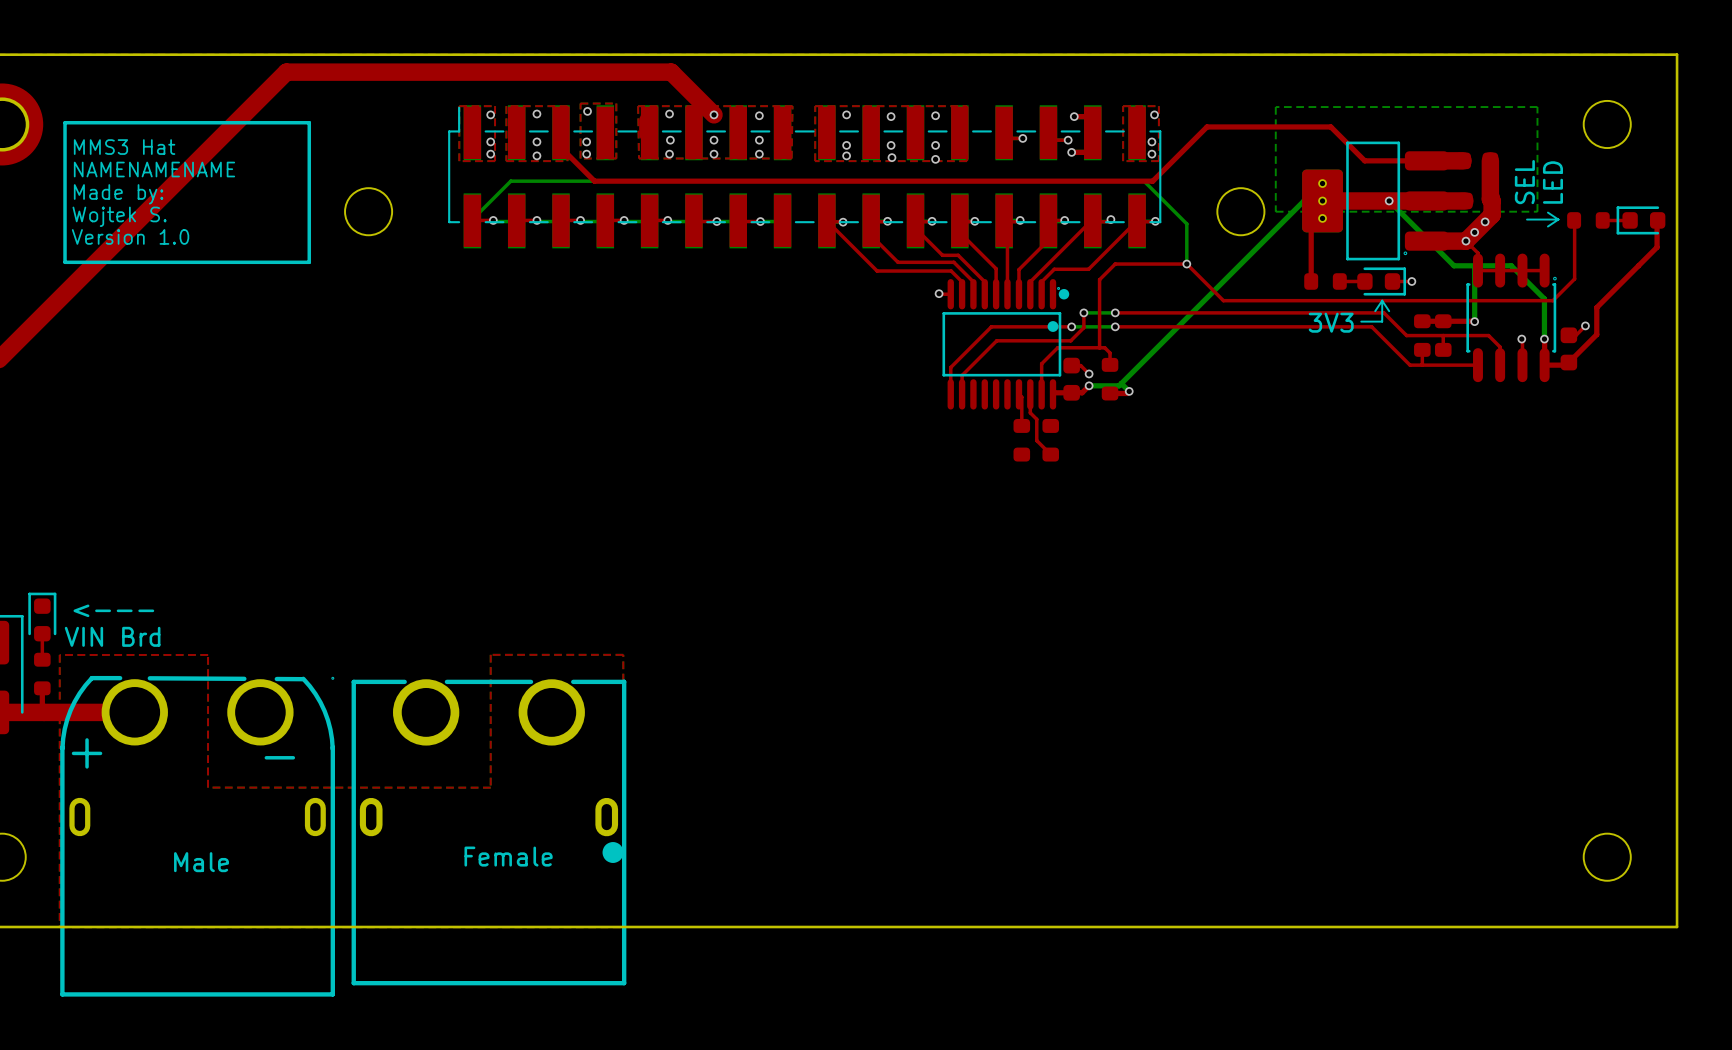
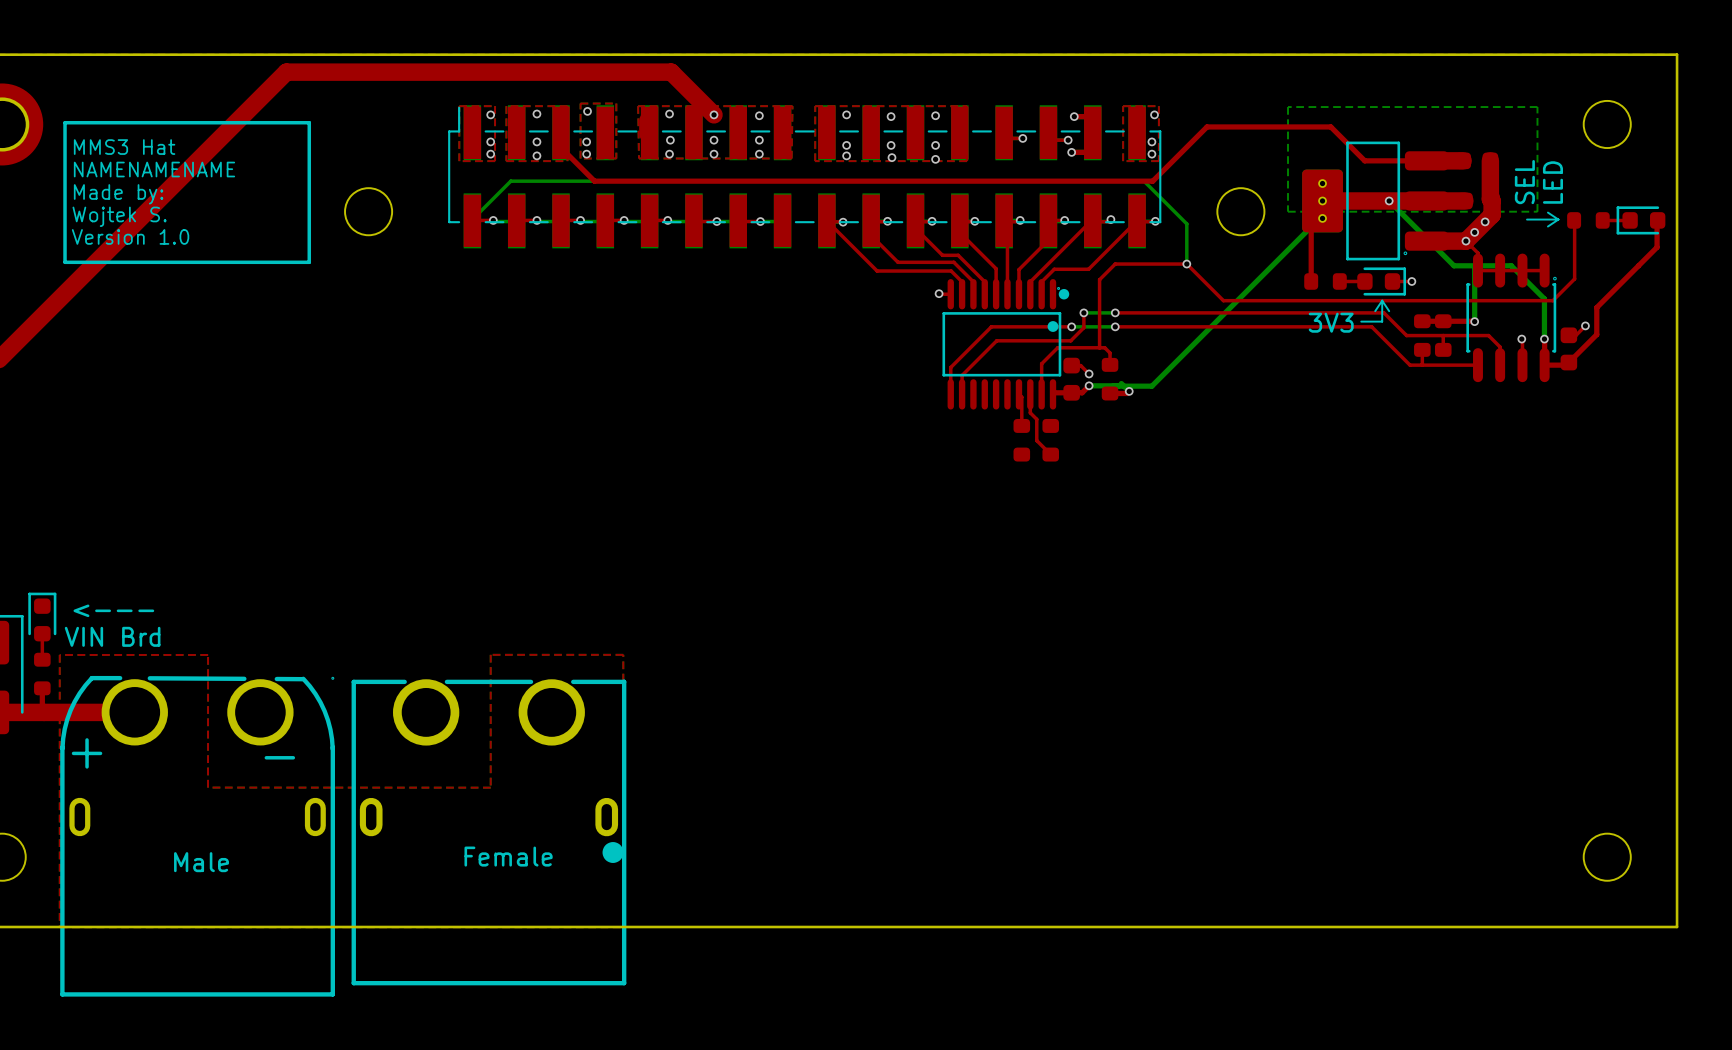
bottom zone outline: (1287, 107) (1275, 107) (1275, 211) (1287, 211) -> (1287, 107) (1287, 211)
bottom track: (1322, 200) (1303, 200) (1119, 385) -> (1322, 200) (1322, 215) (1151, 386) (1113, 385)

